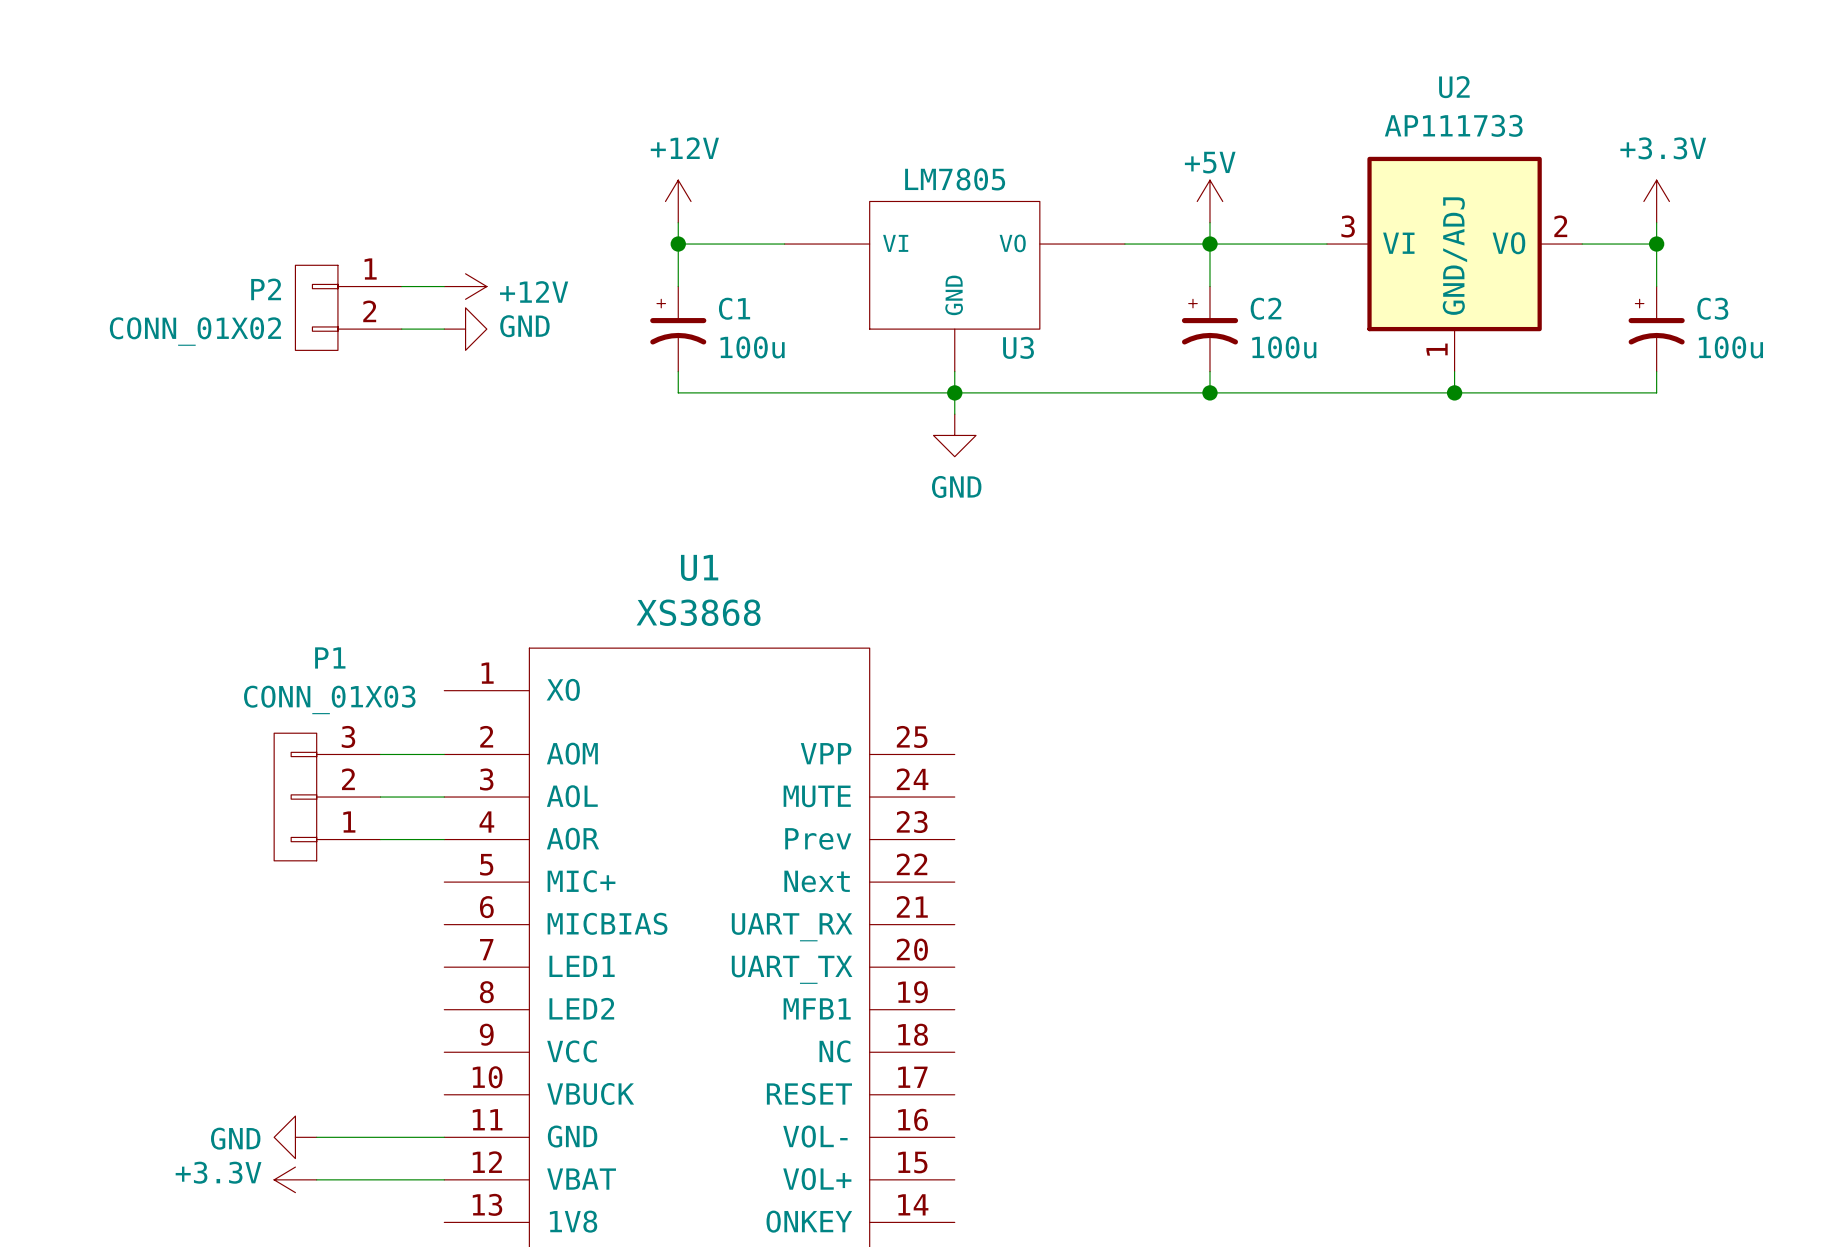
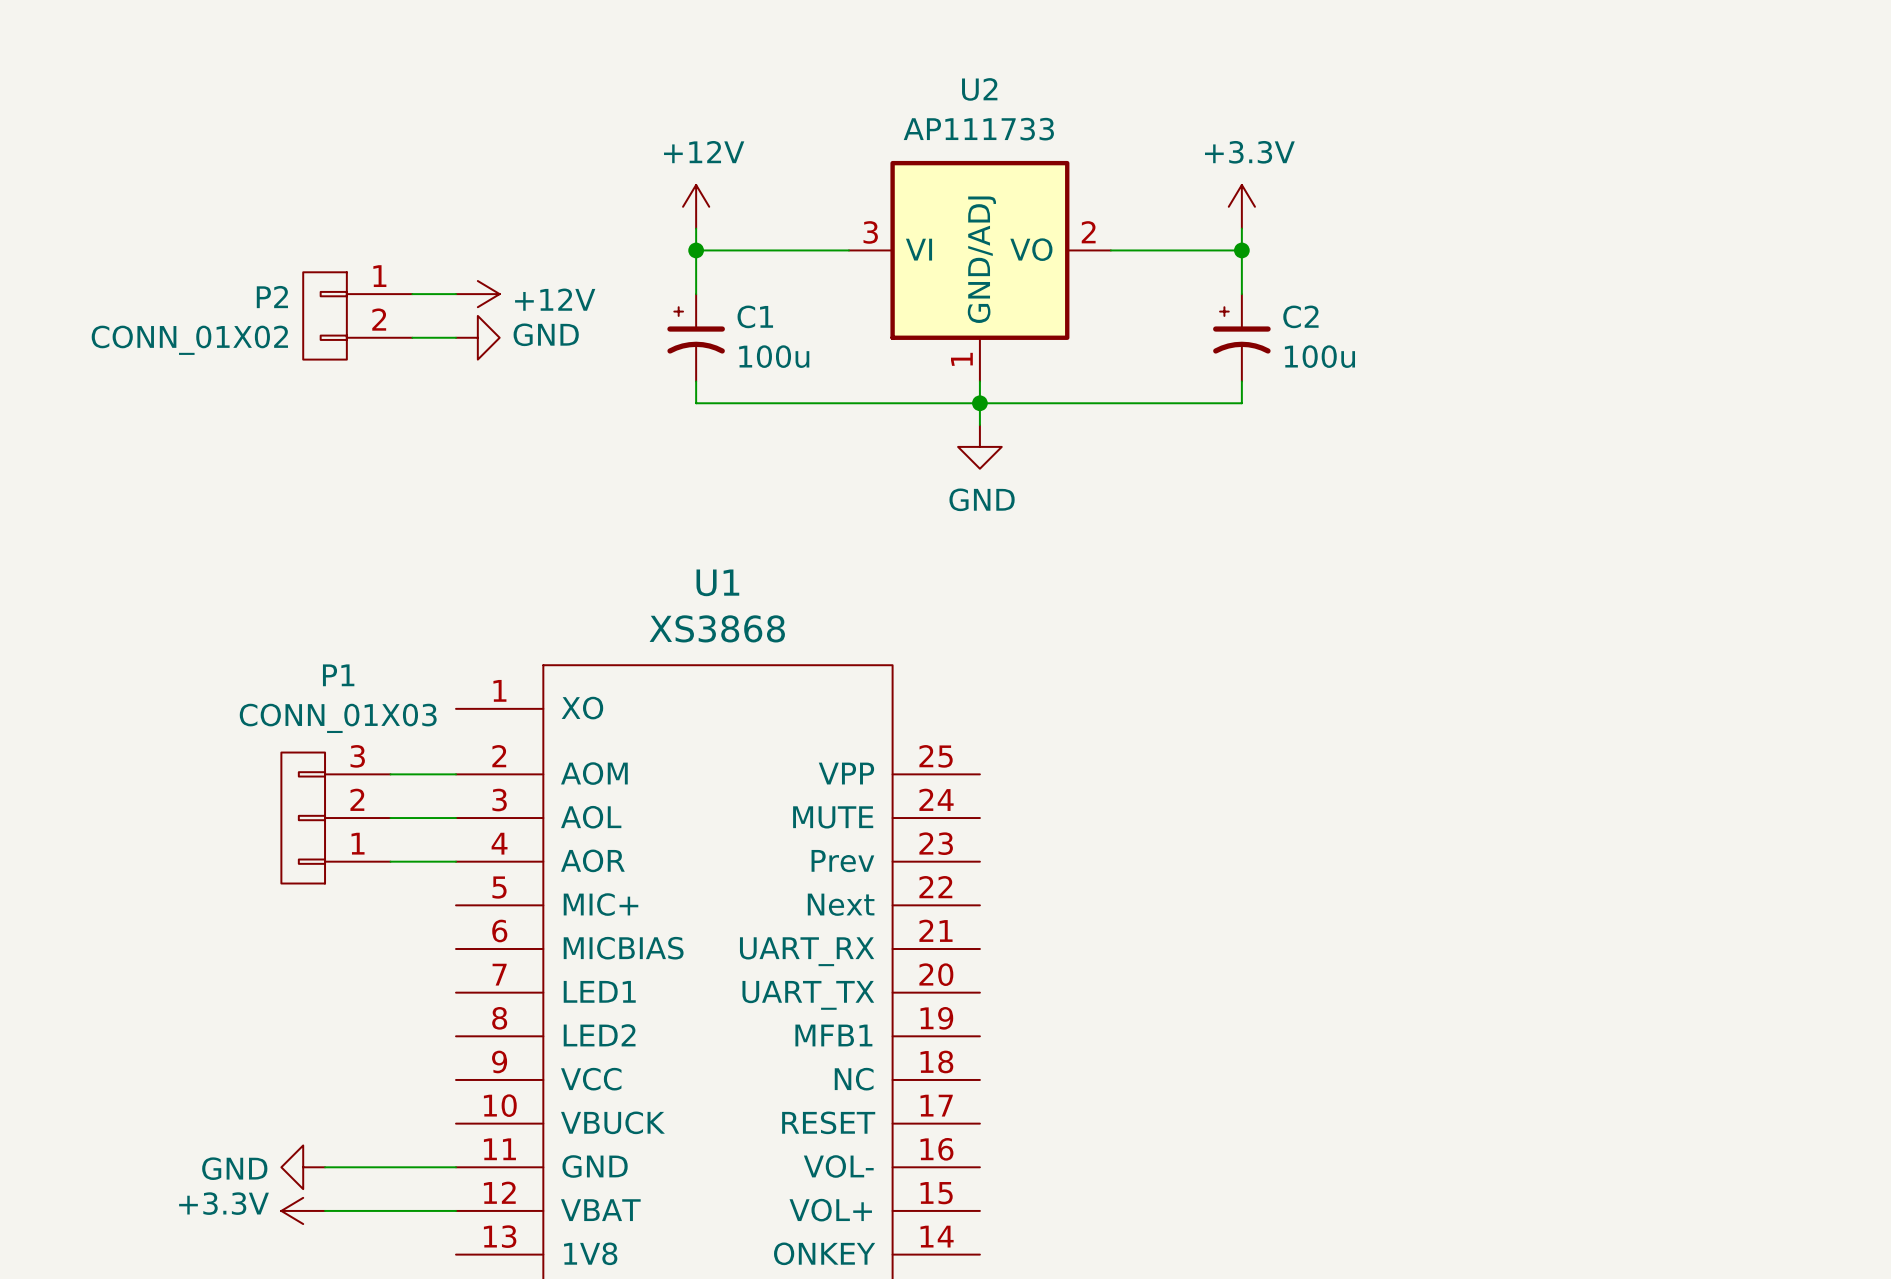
power symbol: +5V (1209, 201) -> +3.3V (1241, 206)
power symbol: +3.3V (1656, 201) -> none
wire: (1656, 222) (1656, 286) -> none
wire: (1209, 244) (1326, 244) -> none
wire: (1582, 244) (1656, 244) -> none
junction: (1656, 244) -> none
U2 position: (1454, 264) -> (979, 271)
U3: LM7805 (954, 286) -> none
C3: 100u (1656, 329) -> none
wire: (1454, 371) (1454, 392) -> none
wire: (1656, 371) (1656, 392) (1209, 392) -> none
junction: (1209, 392) -> none
junction: (1454, 392) -> none

